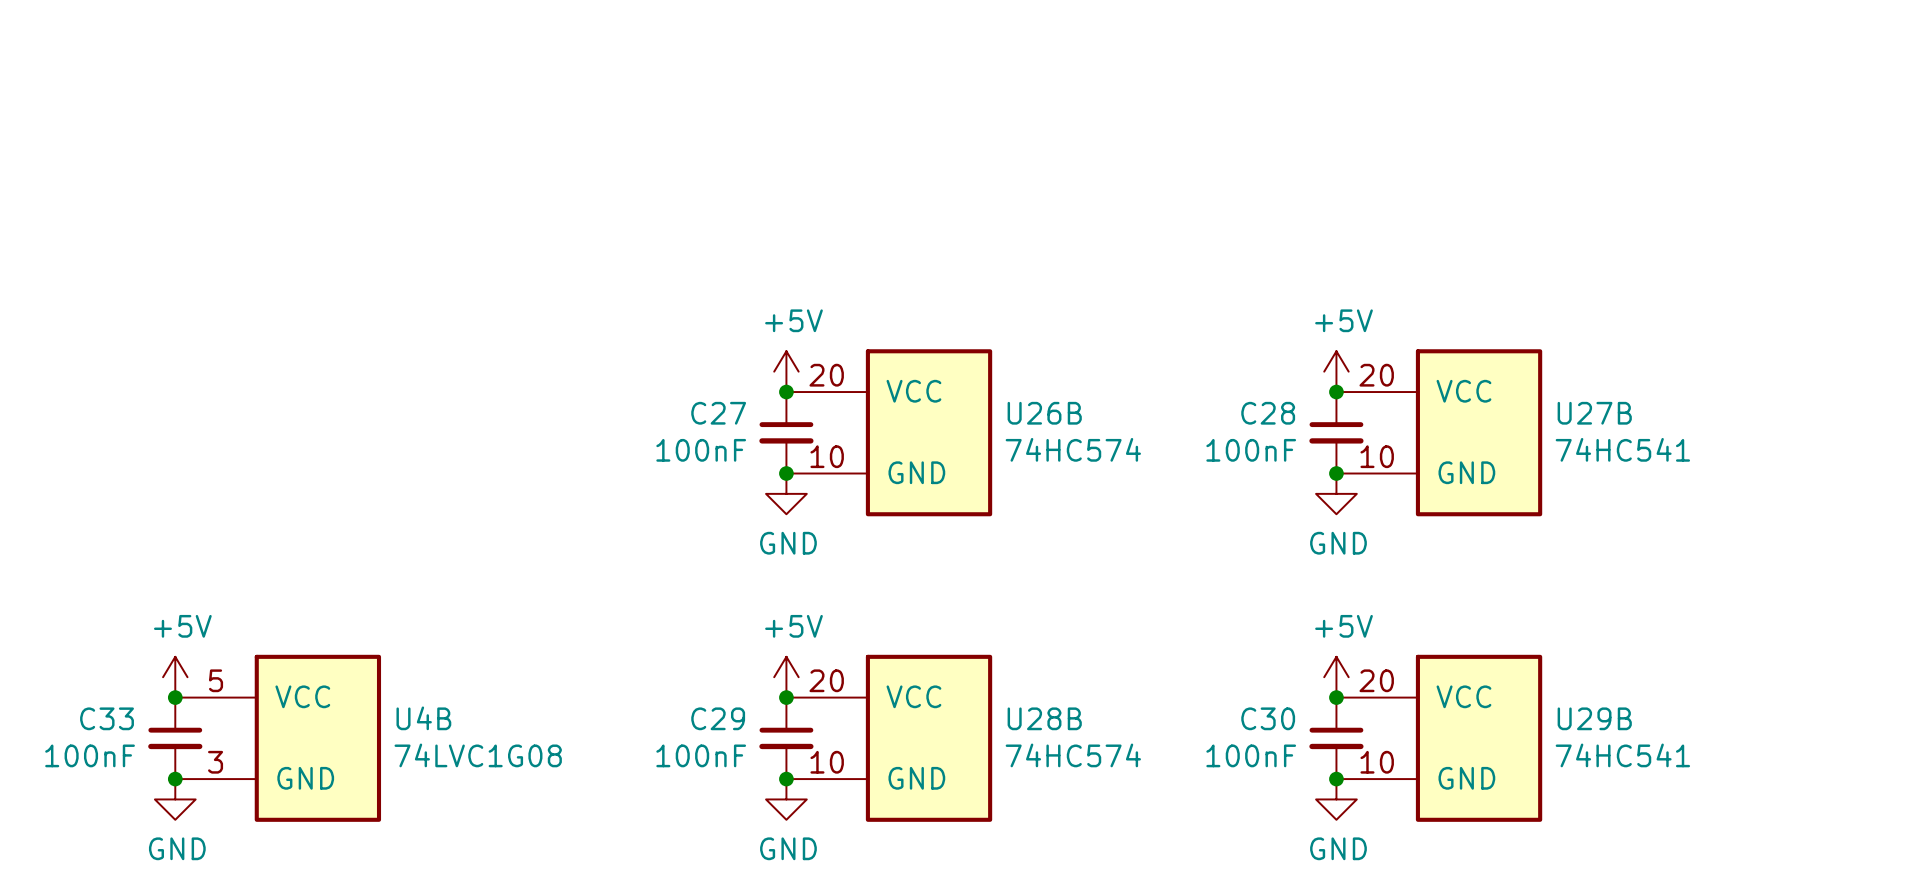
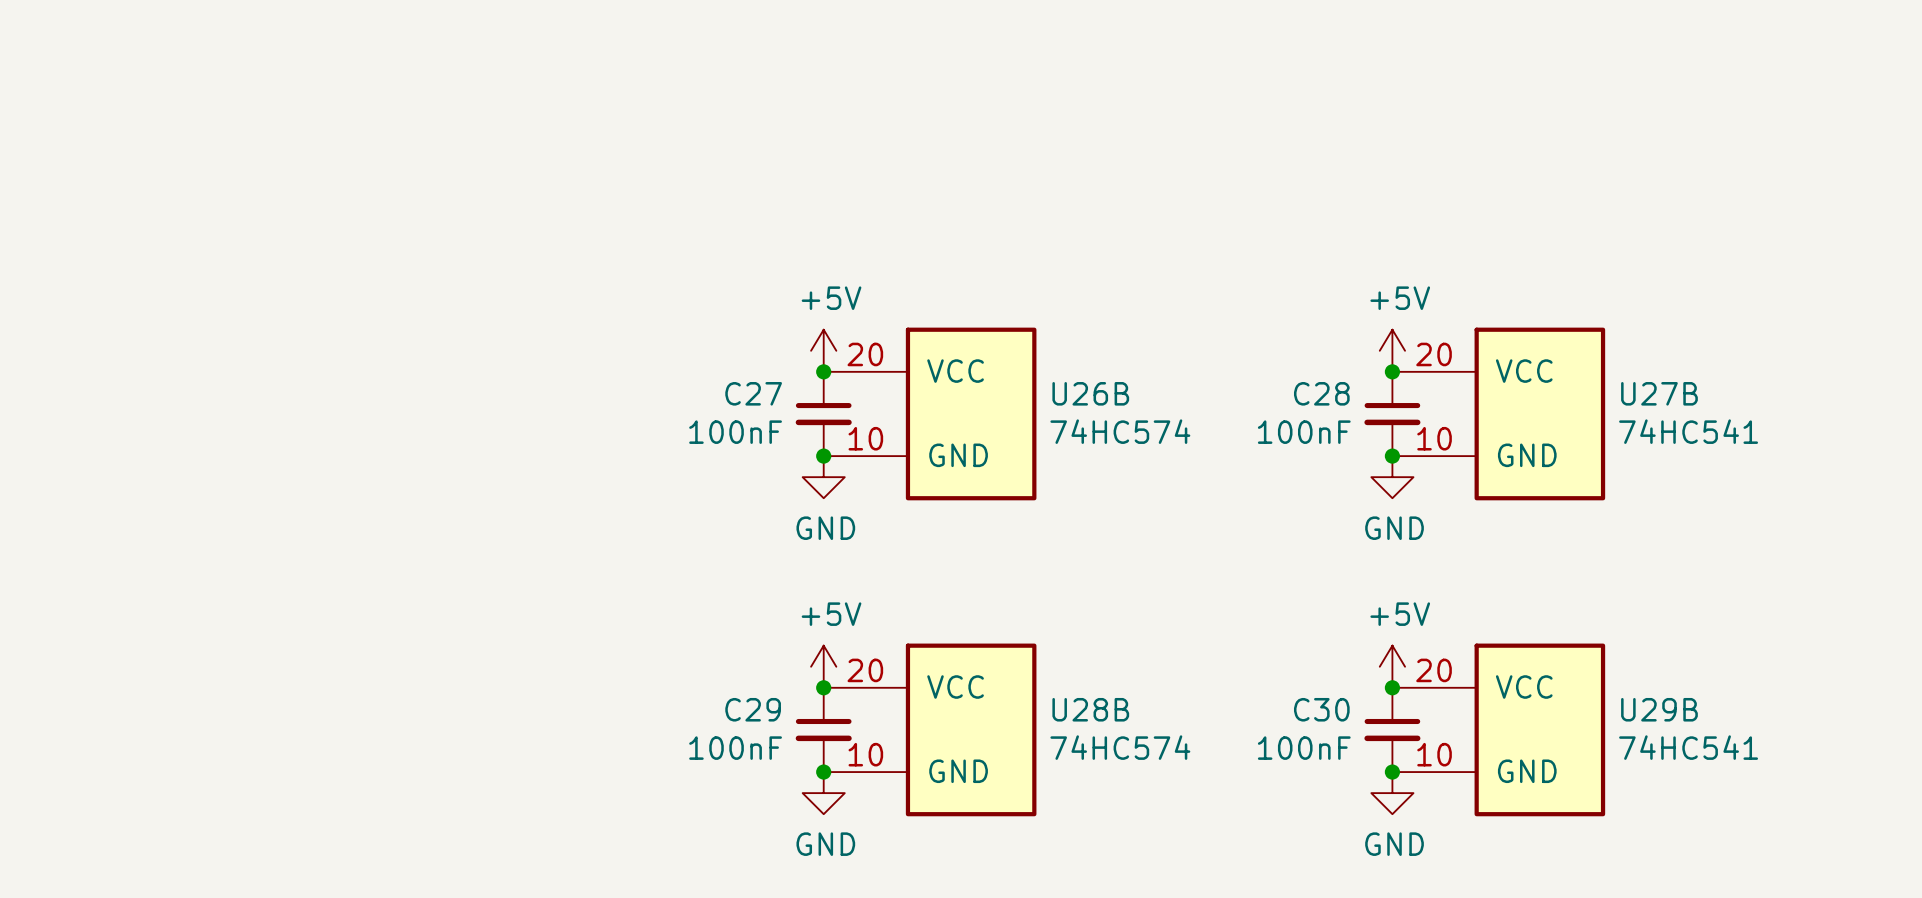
power symbol: +5V (175, 677) -> none
junction: (175, 697) -> none
C33: 100nF (175, 738) -> none
U4B: 74LVC1G08 (278, 738) -> none
junction: (175, 779) -> none
power symbol: GND (175, 799) -> none

